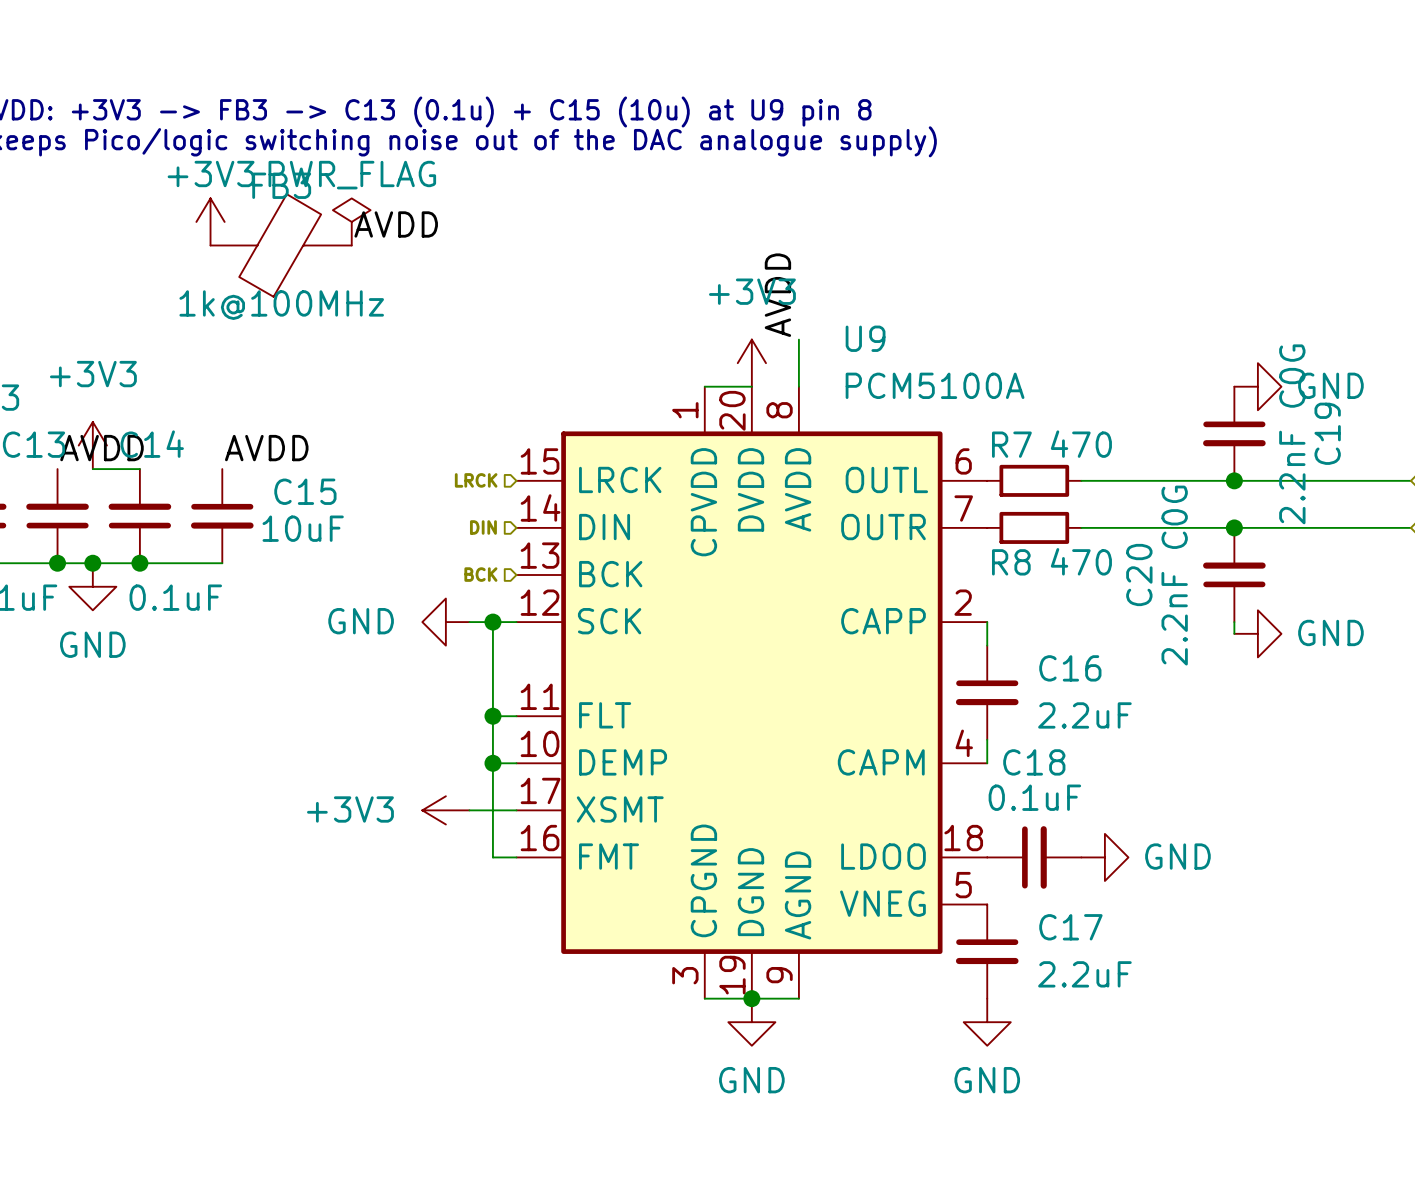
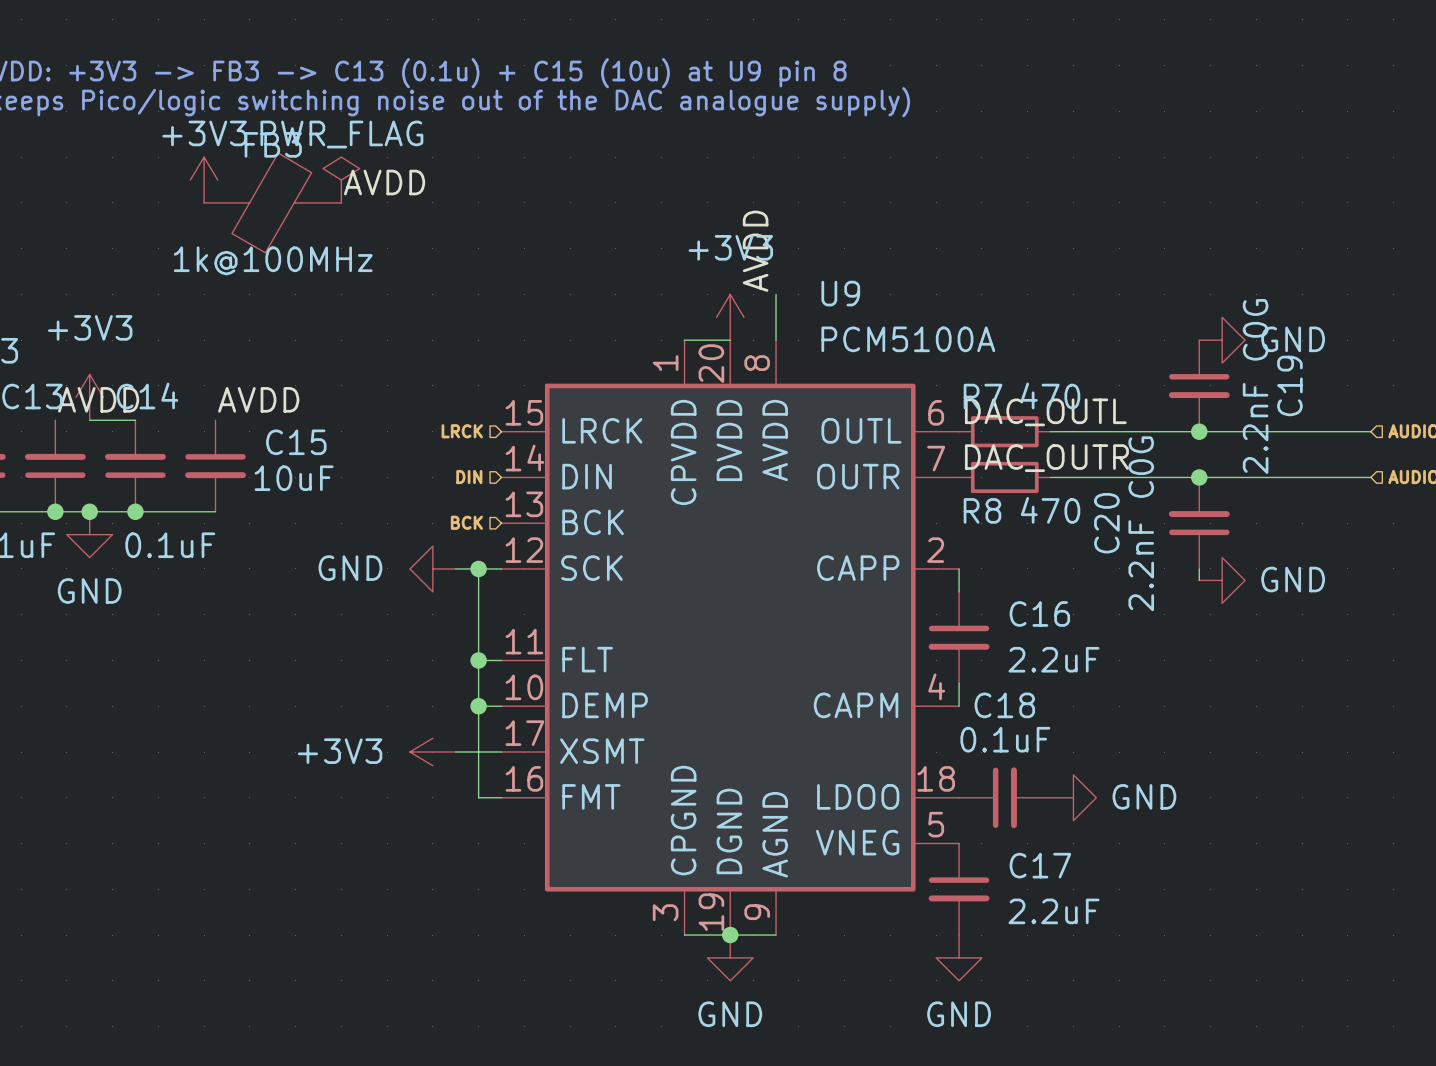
label: none -> DAC_OUTL (1045, 412)
label: none -> DAC_OUTR (1046, 458)

